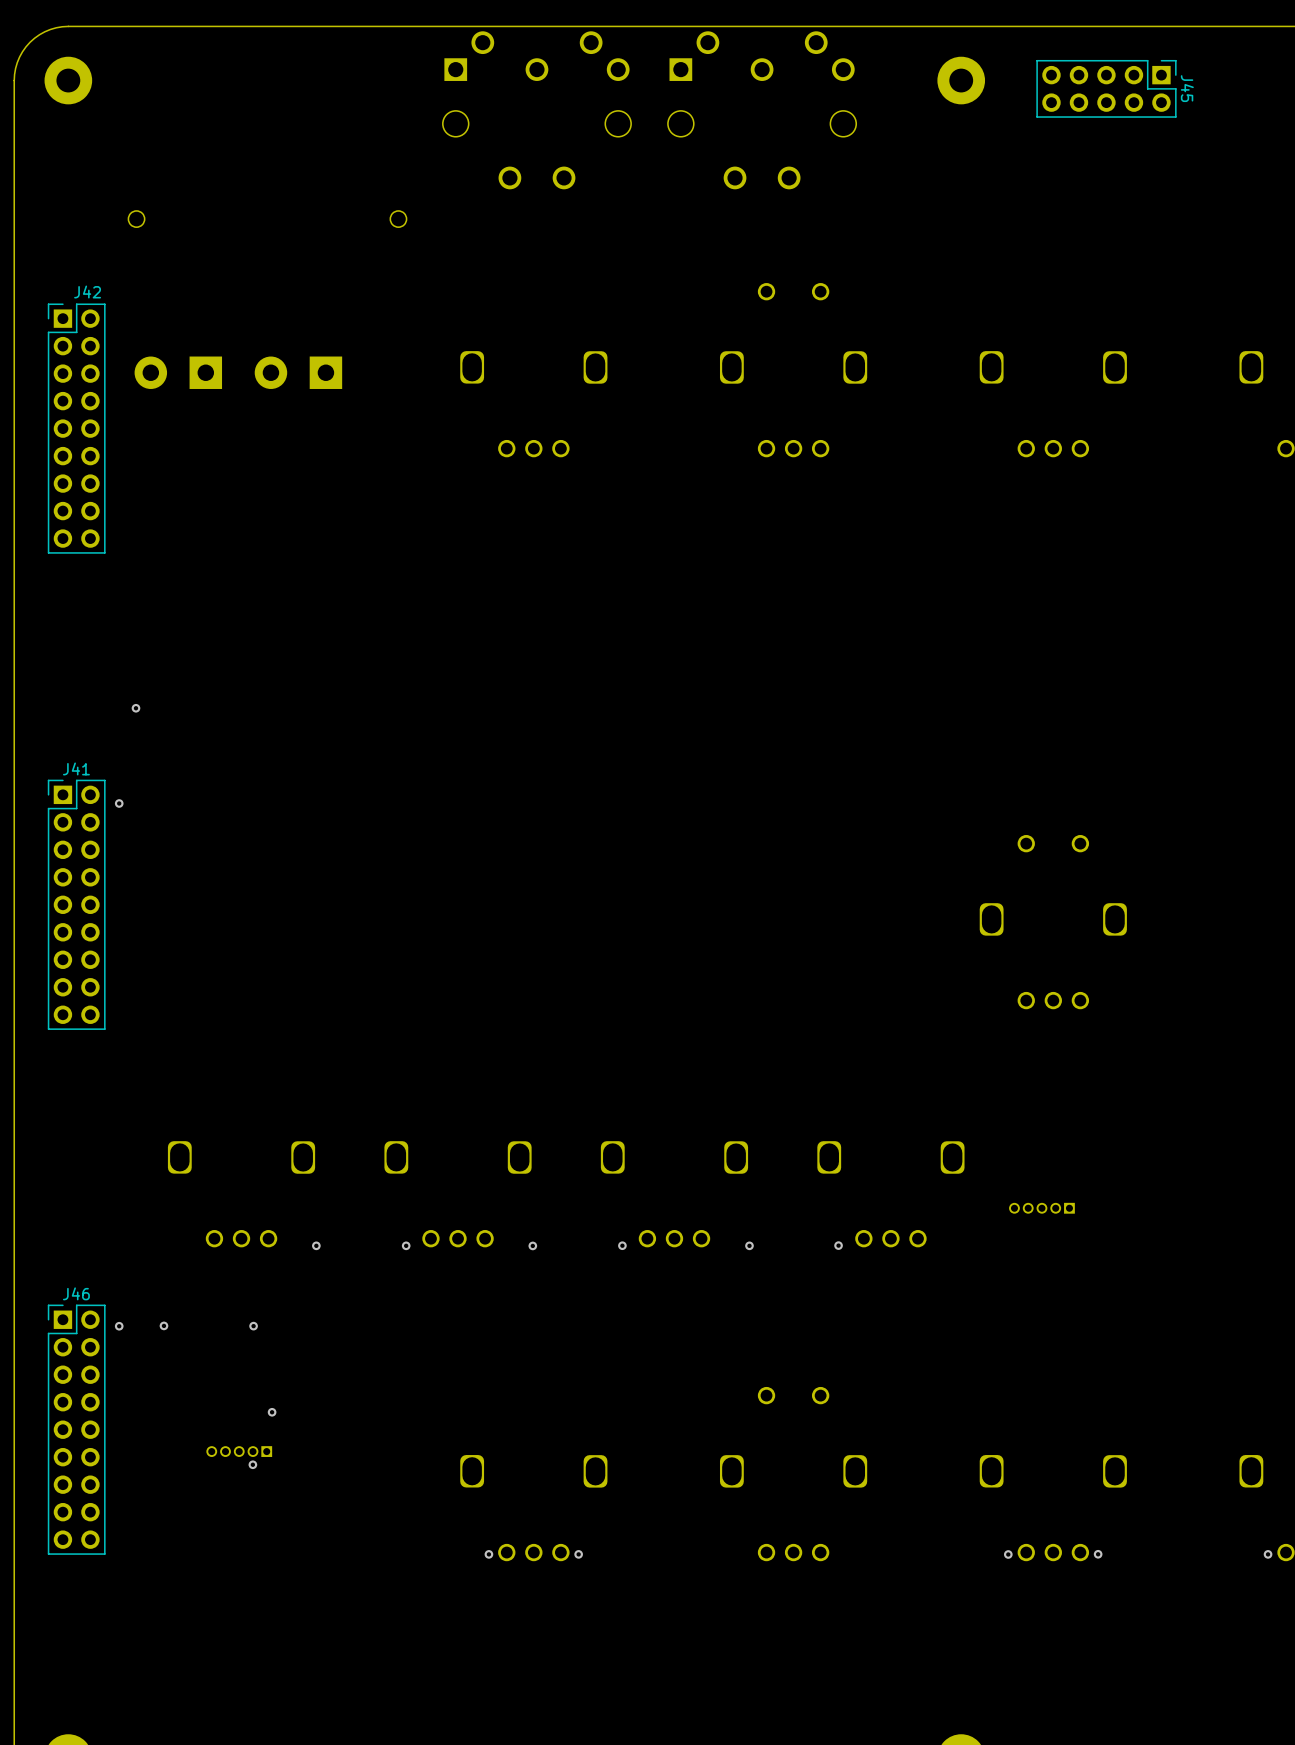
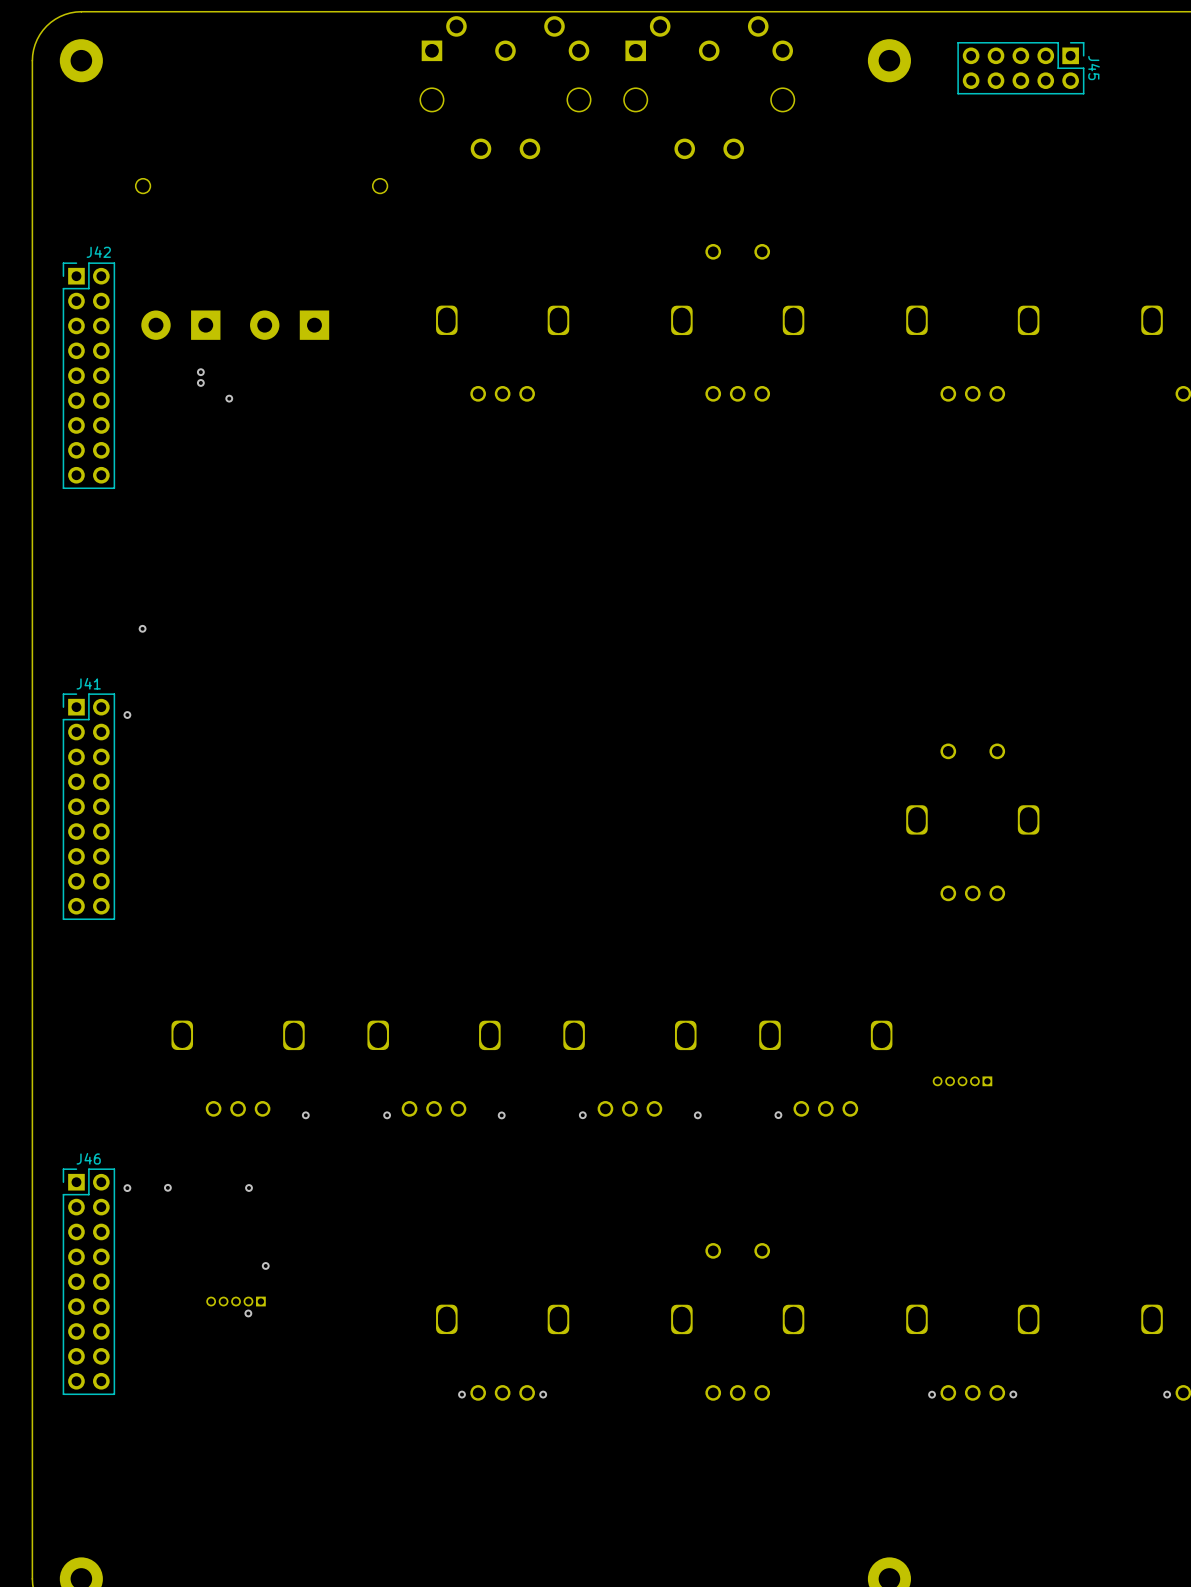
via: none -> (200, 372)
via: none -> (200, 382)
via: none -> (229, 398)

